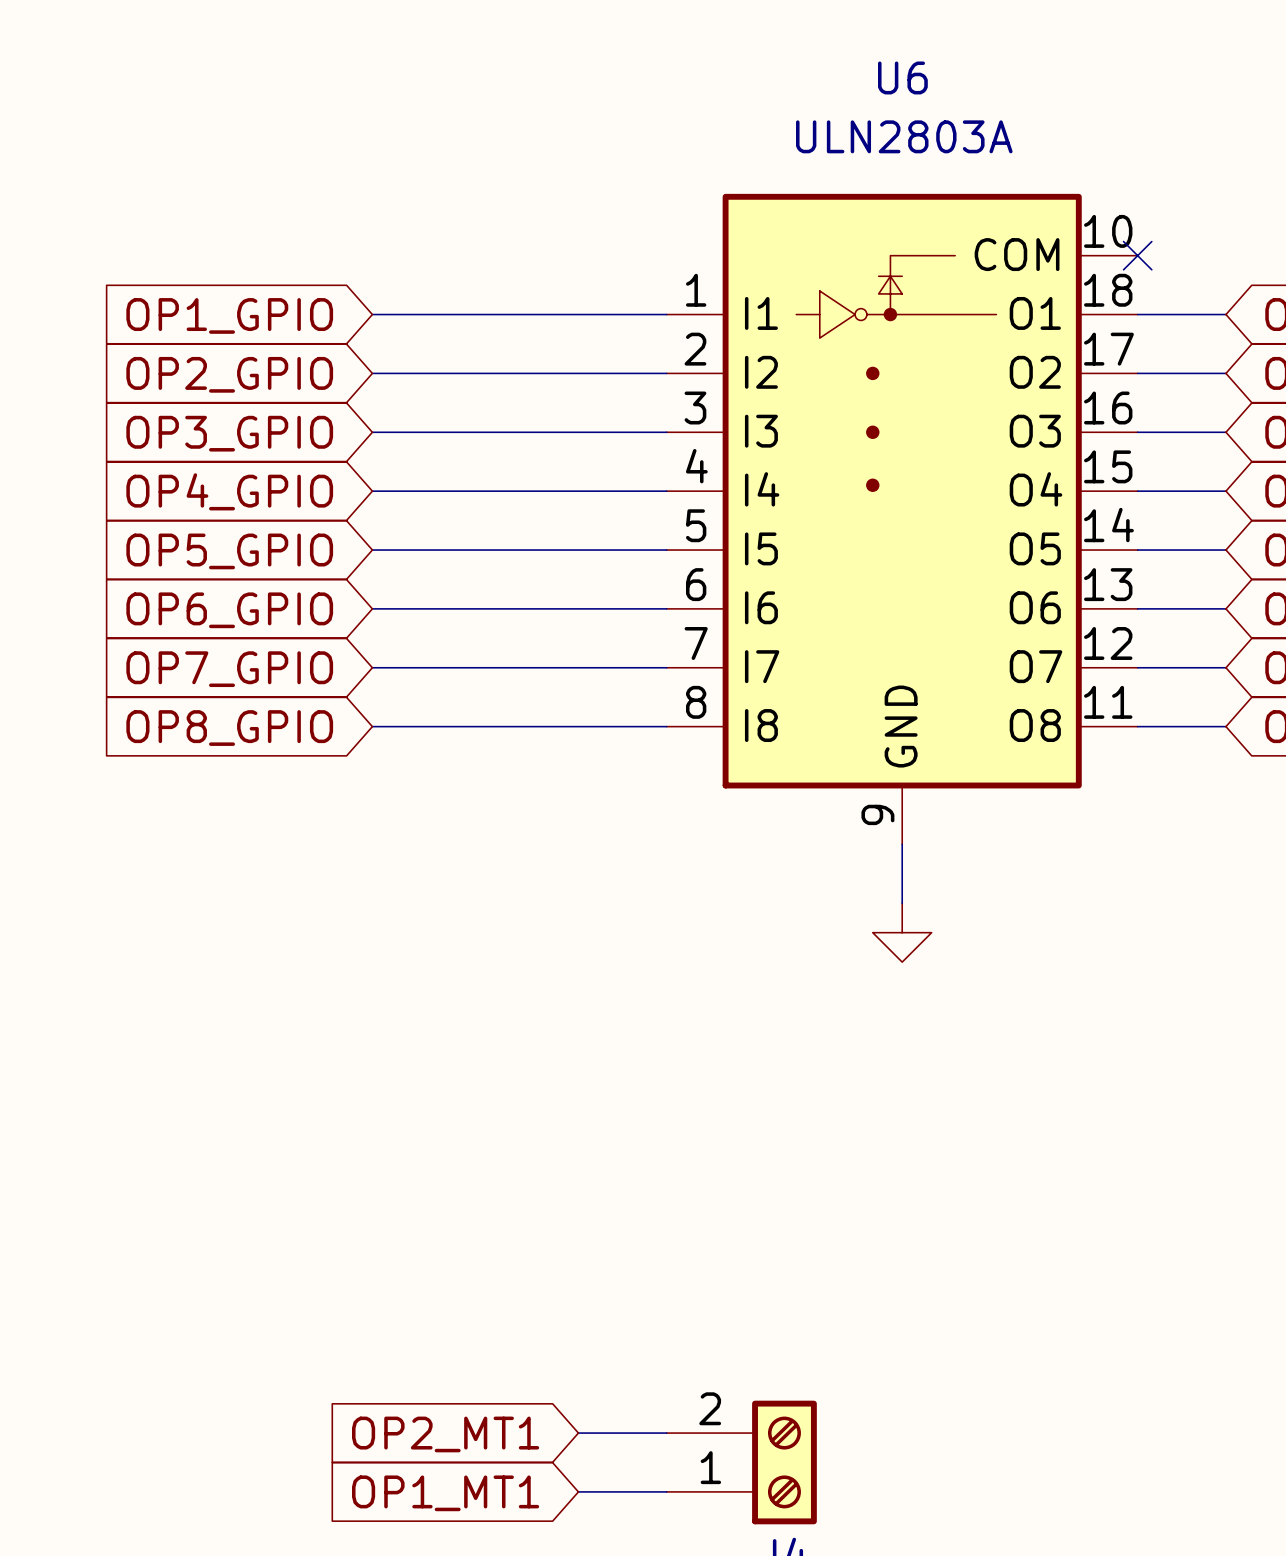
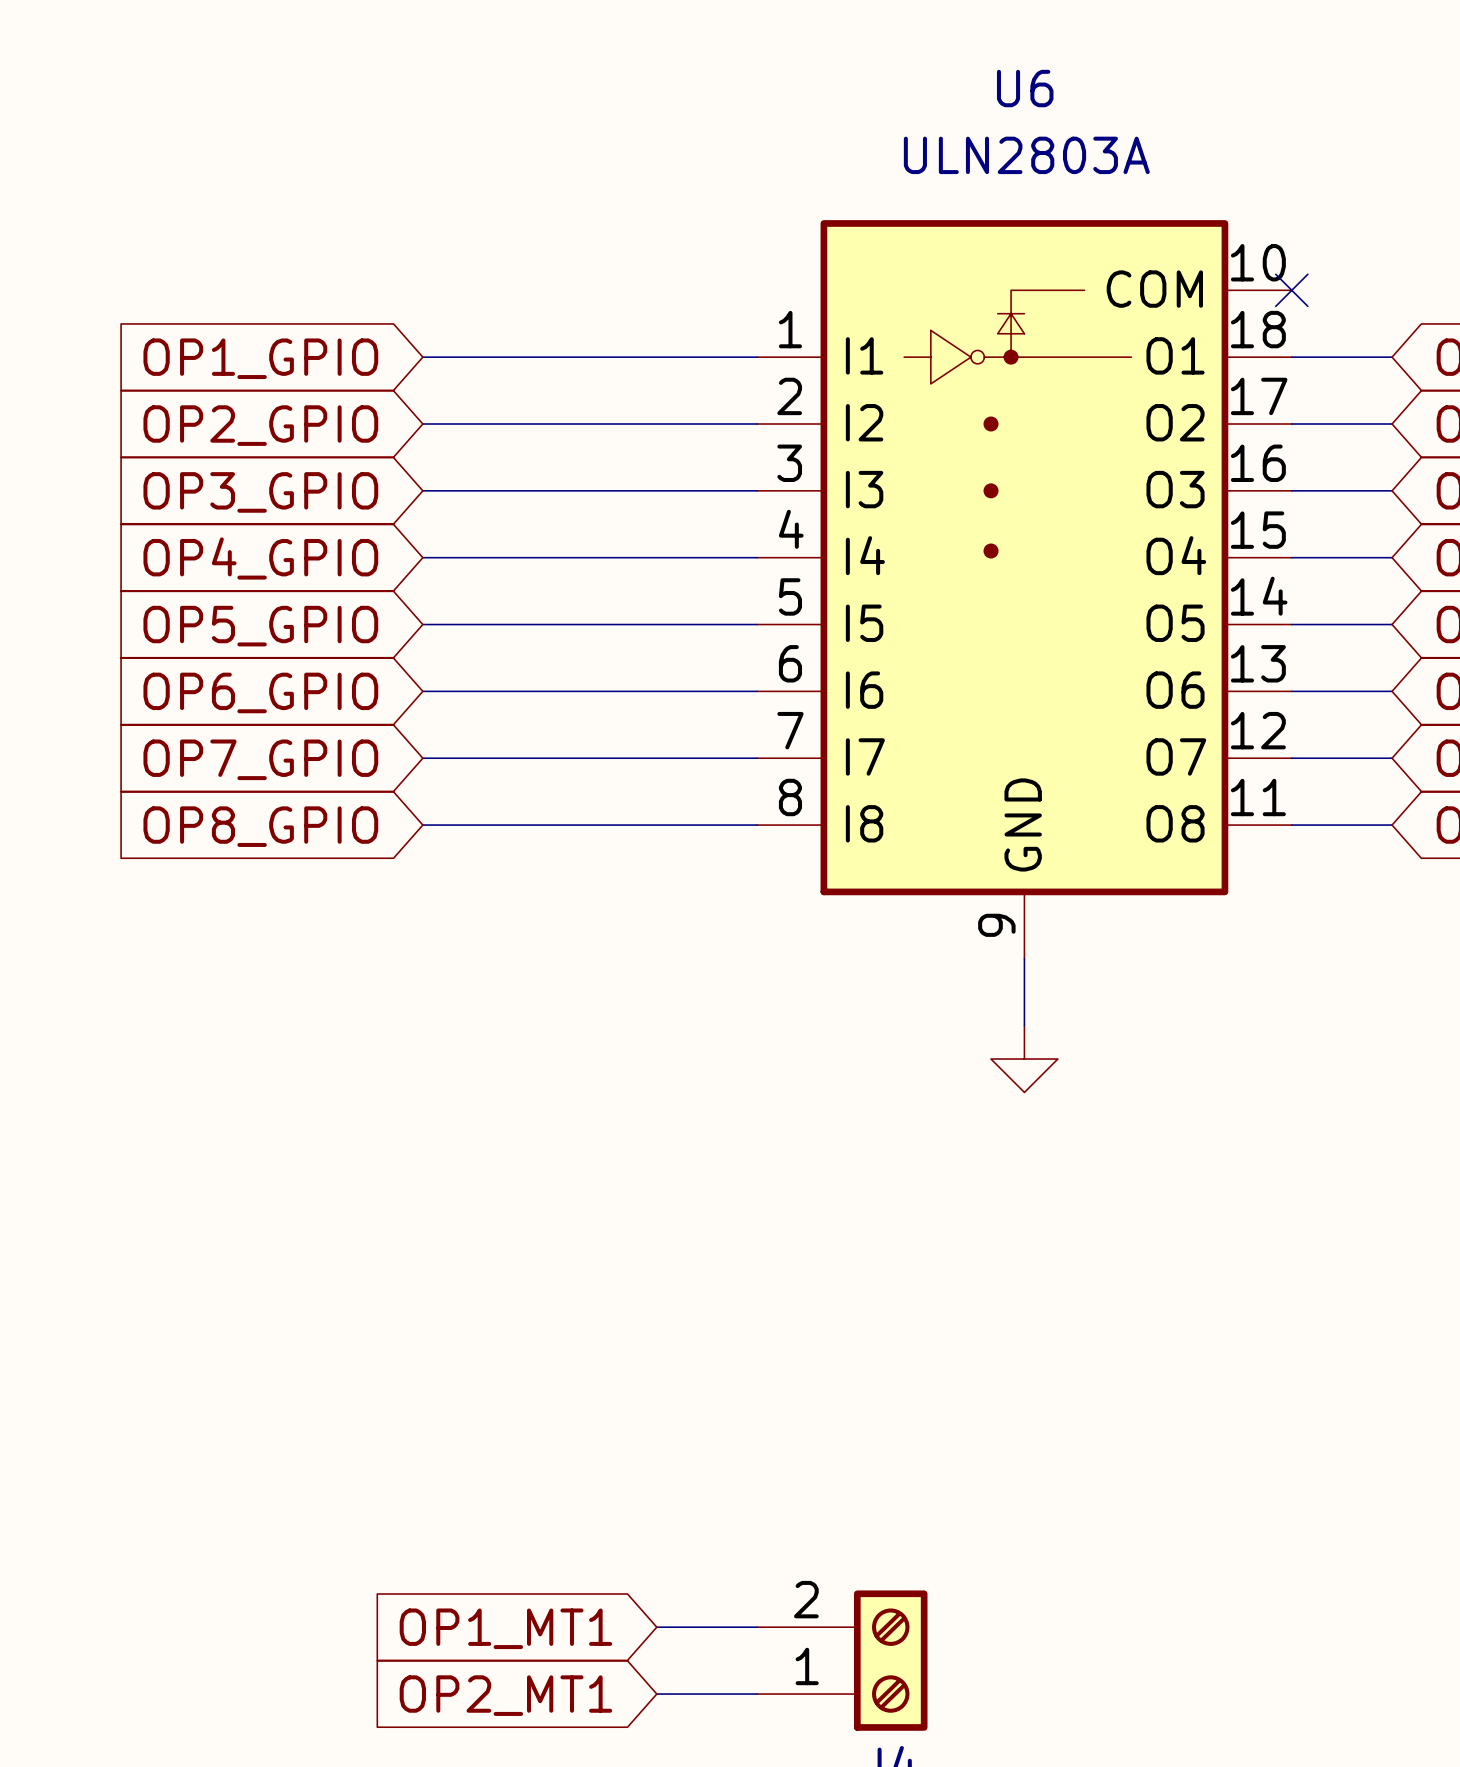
global label: OP2_MT1 (445, 1434) -> OP1_MT1 (505, 1628)
global label: OP1_MT1 (445, 1493) -> OP2_MT1 (505, 1695)

